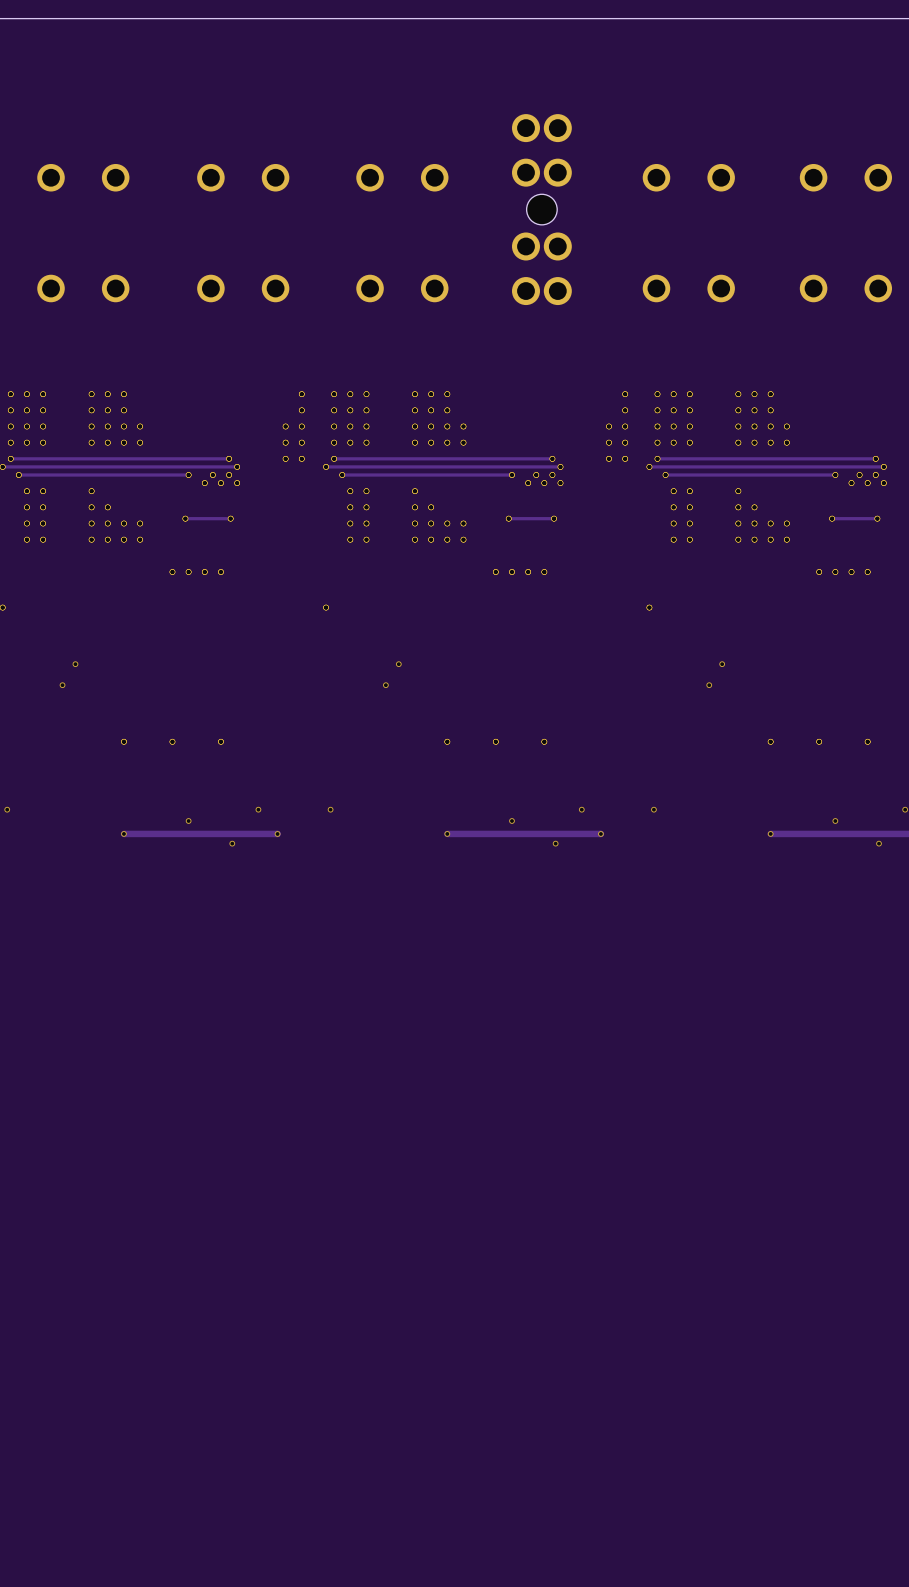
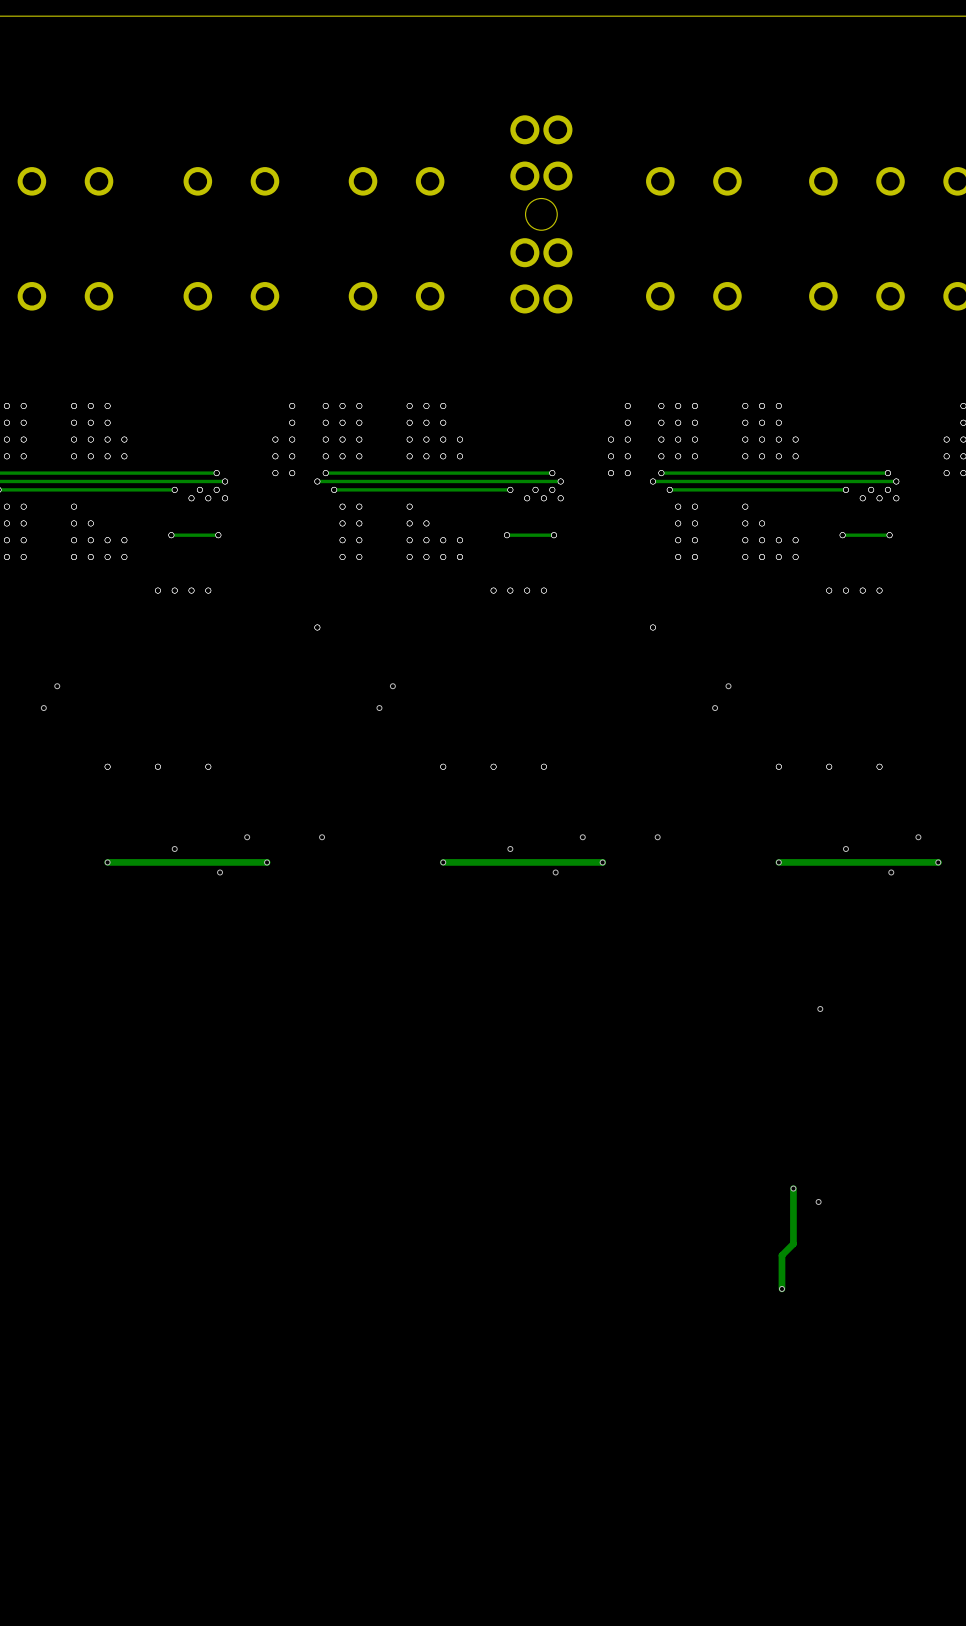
via: none -> (820, 1009)
track: none -> (793, 1188) (793, 1243) (781, 1255) (781, 1288)
via: none -> (793, 1188)
via: none -> (818, 1201)
via: none -> (781, 1288)

